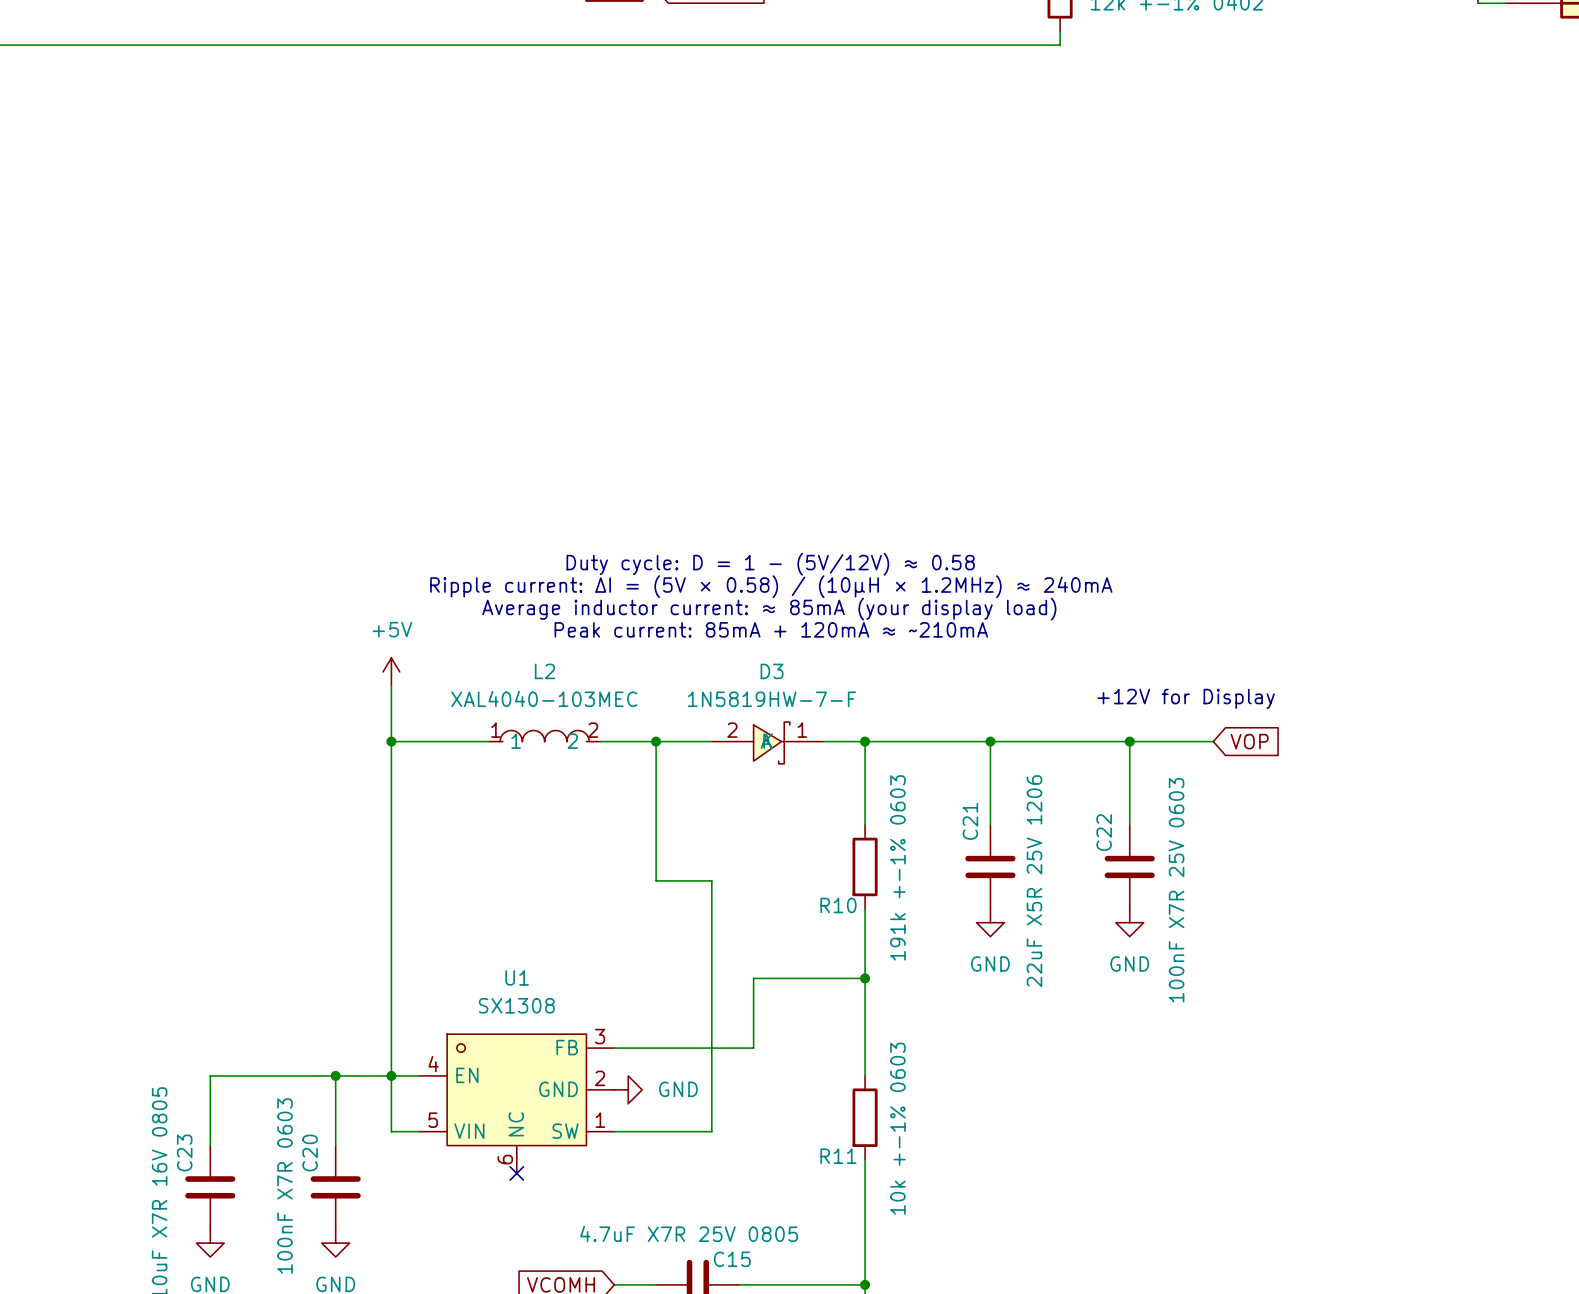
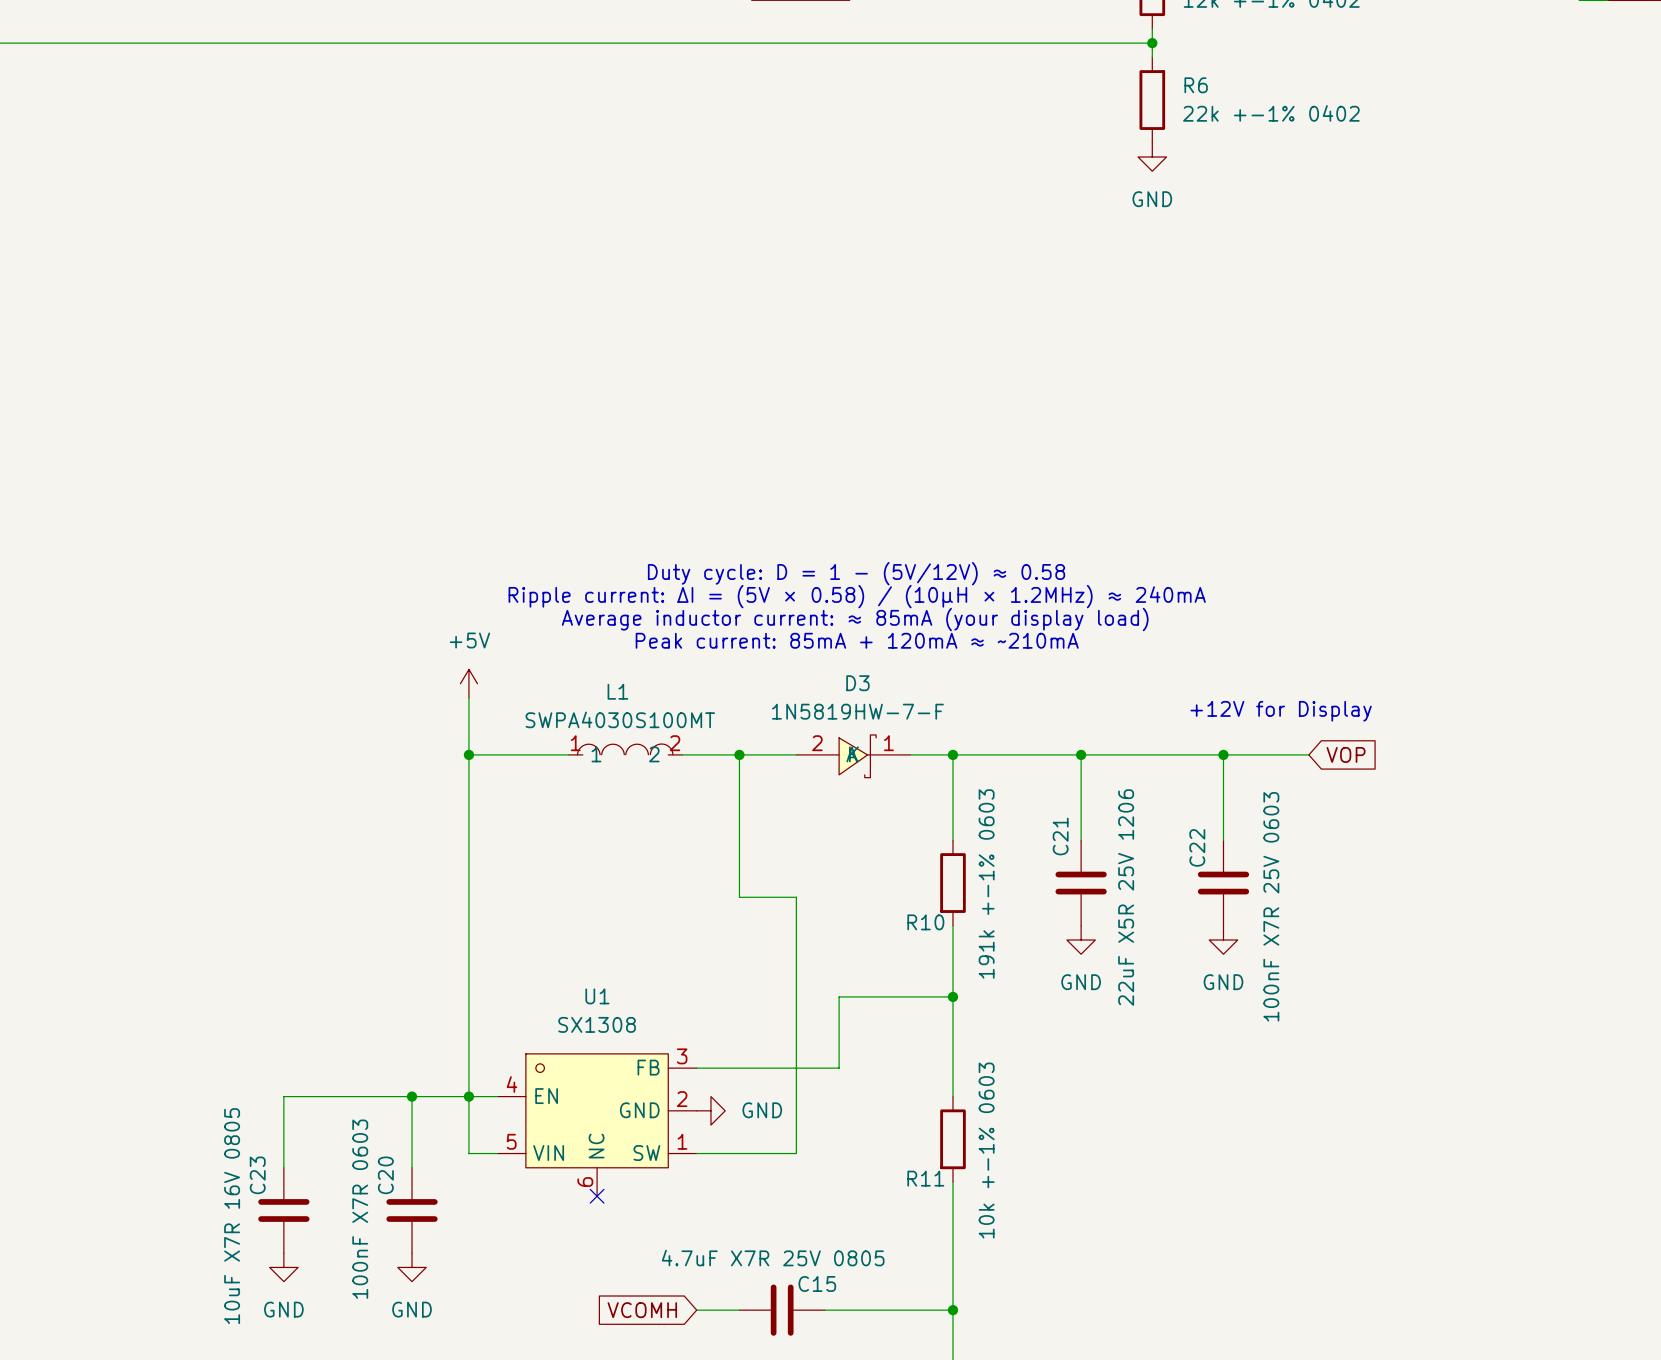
wire: none -> (1152, 43) (1152, 57)
junction: none -> (1152, 43)
R6: none -> 22k +-1% 0402 (1152, 100)
power symbol: none -> GND (1152, 157)
L2: XAL4040-103MEC (544, 736) -> none
L1: none -> SWPA4030S100MT (625, 749)

